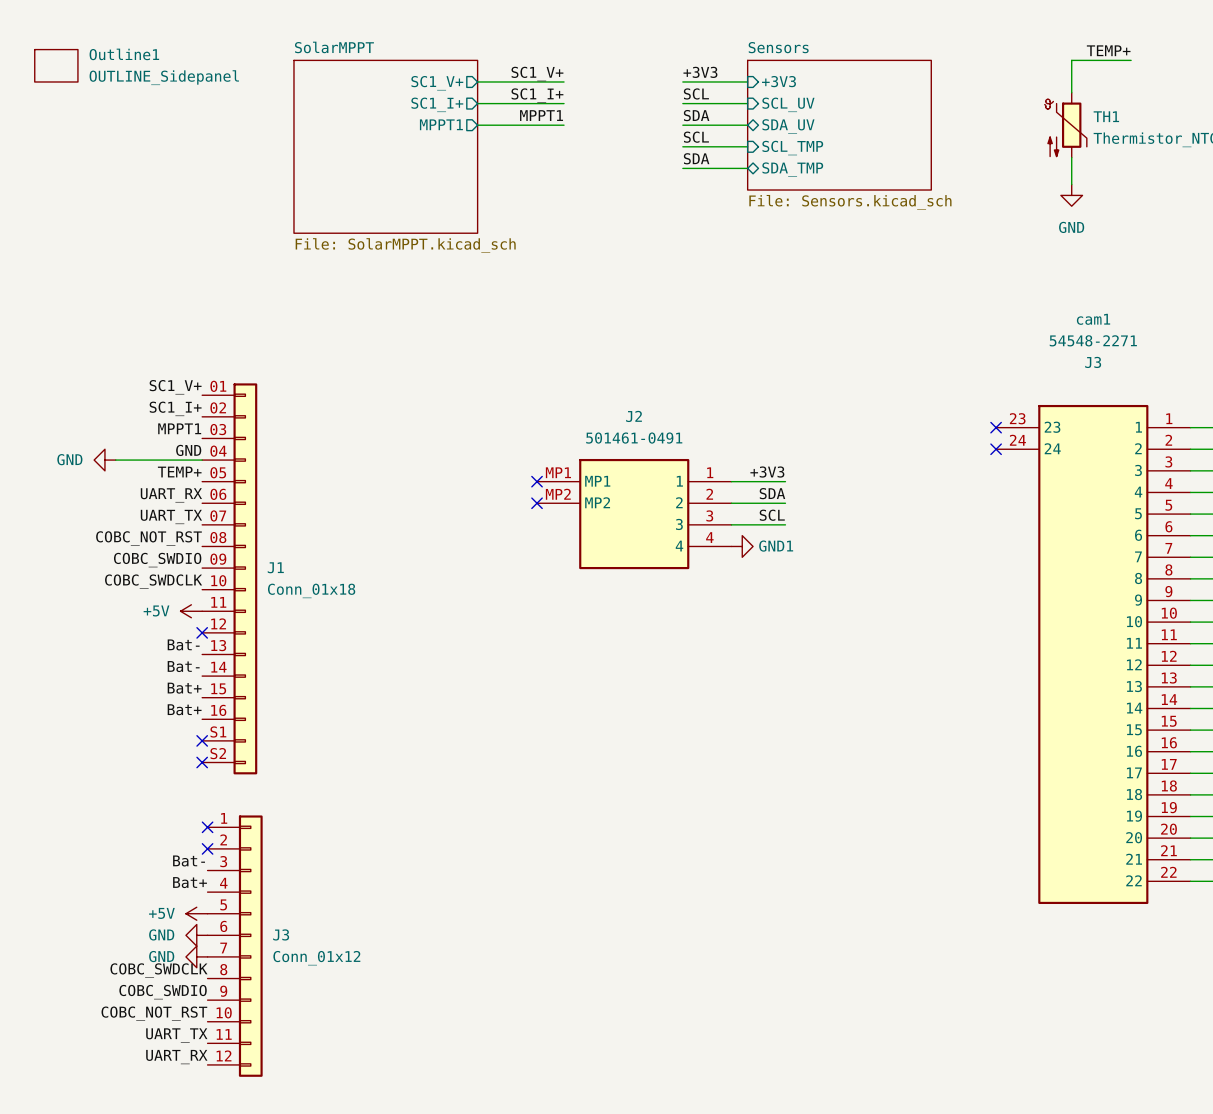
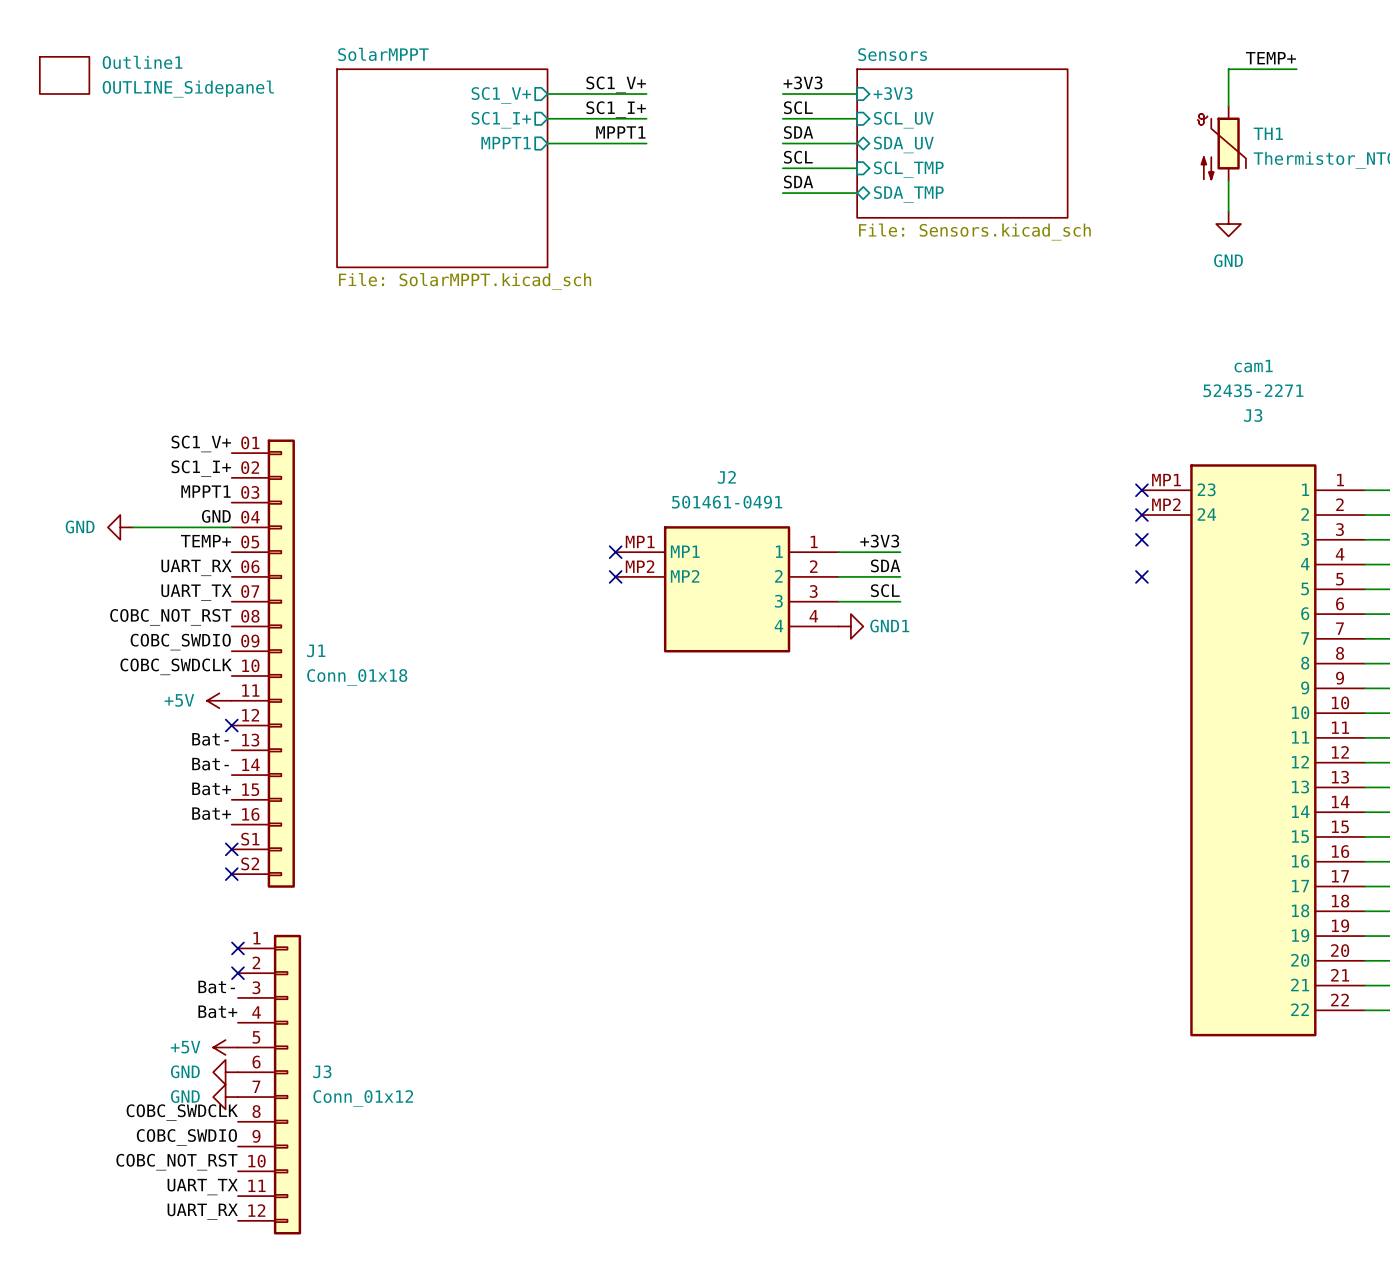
cam1 value: 54548-2271 (1093, 340) -> 52435-2271 (1253, 390)
cam1 pin number: 23 (1017, 418) -> MP1 (1166, 480)
cam1 pin number: 24 (1017, 440) -> MP2 (1166, 504)
no-connect mark: none -> (1141, 539)
no-connect mark: none -> (1141, 576)

